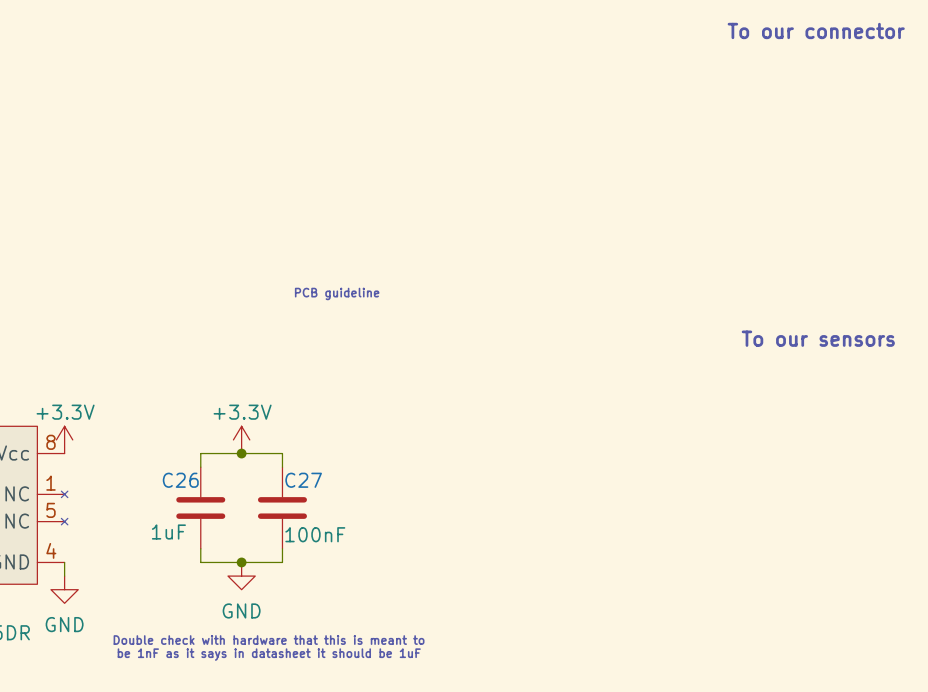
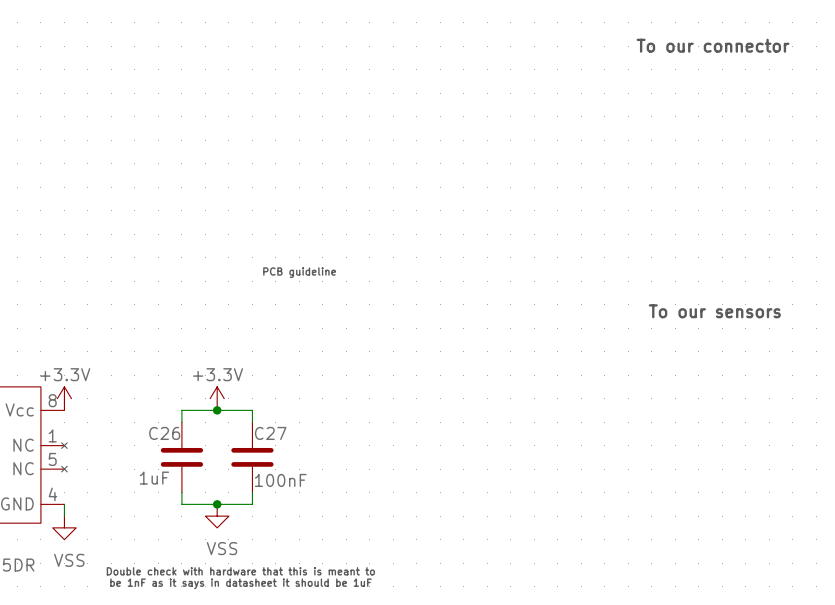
power symbol: GND (241, 576) -> VSS (217, 516)
power symbol: GND (64, 589) -> VSS (64, 527)

